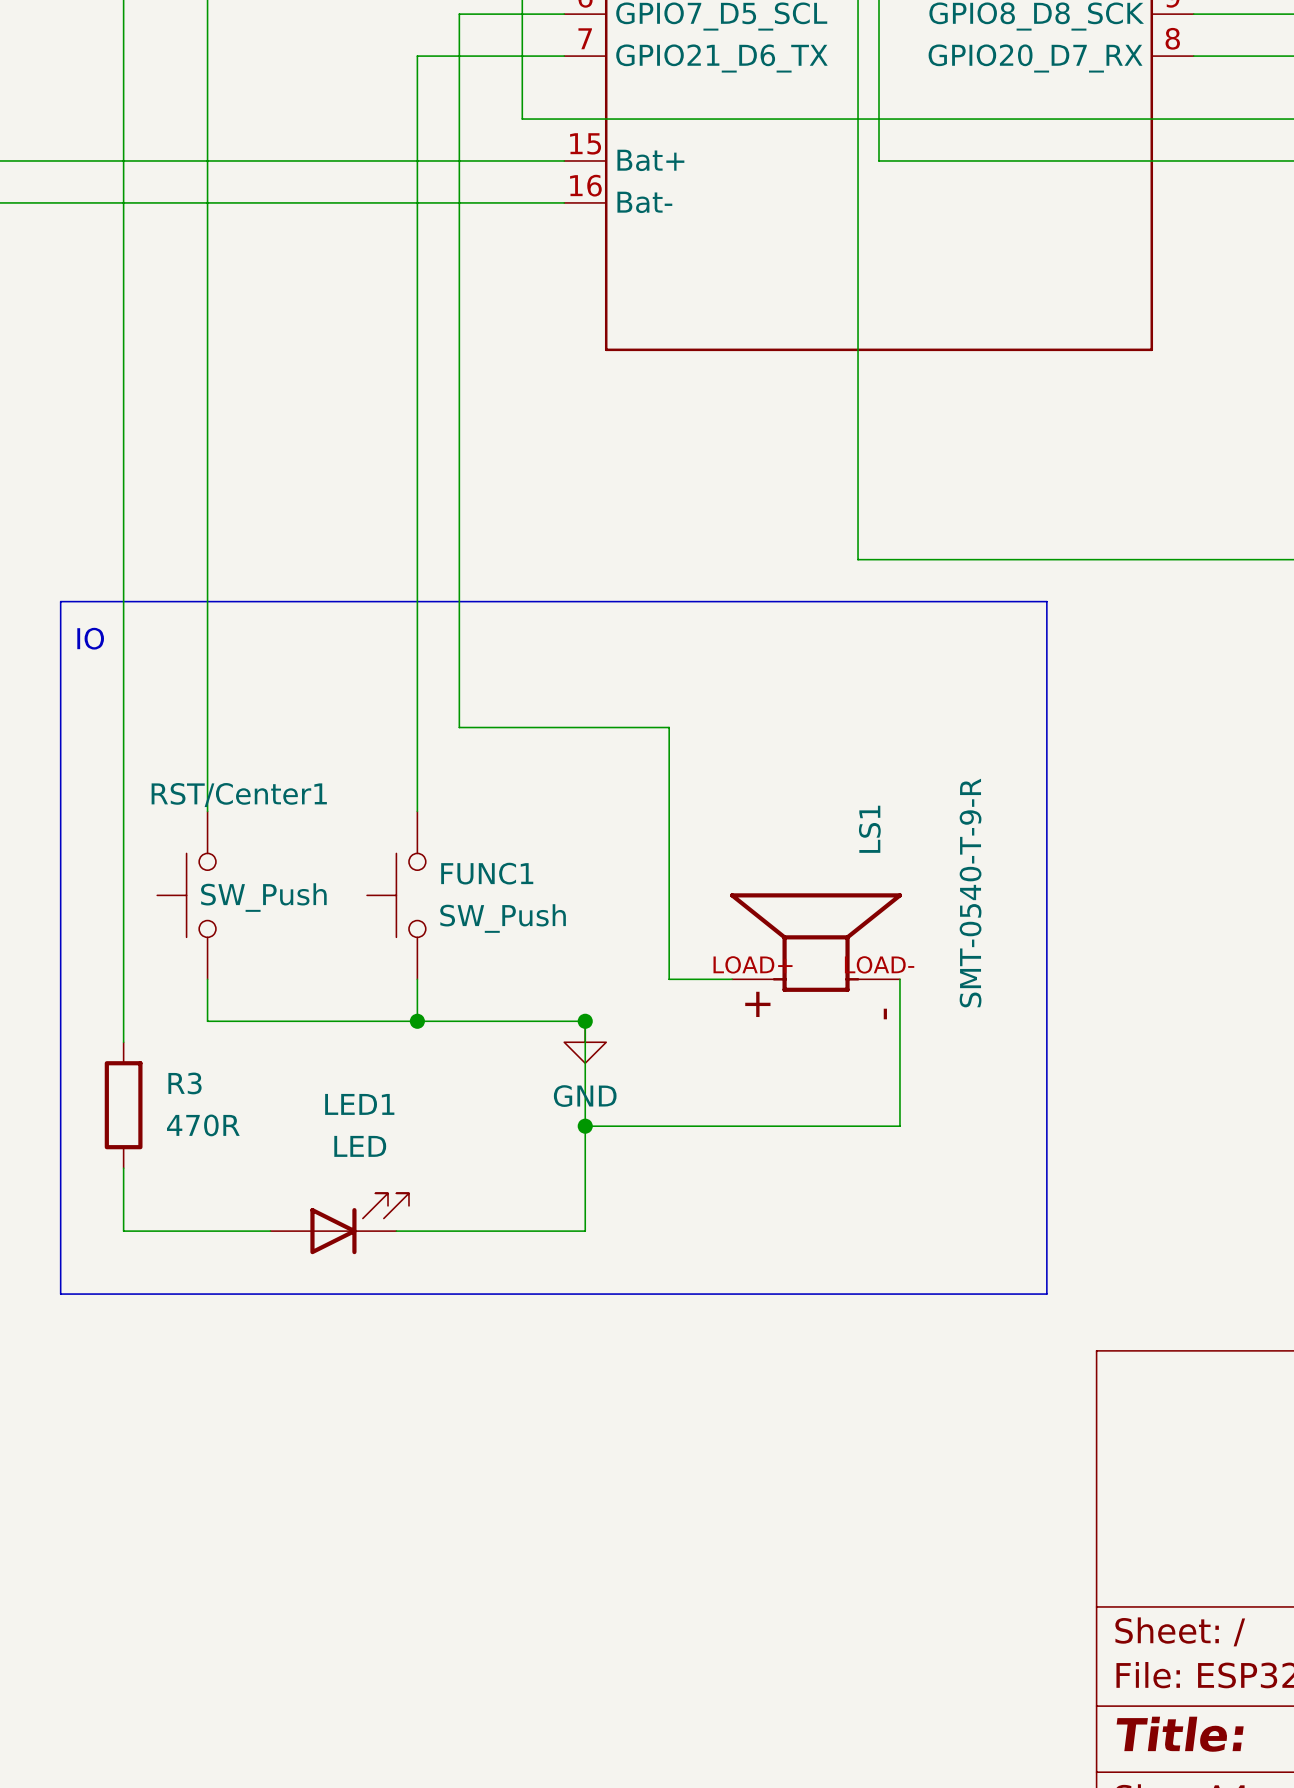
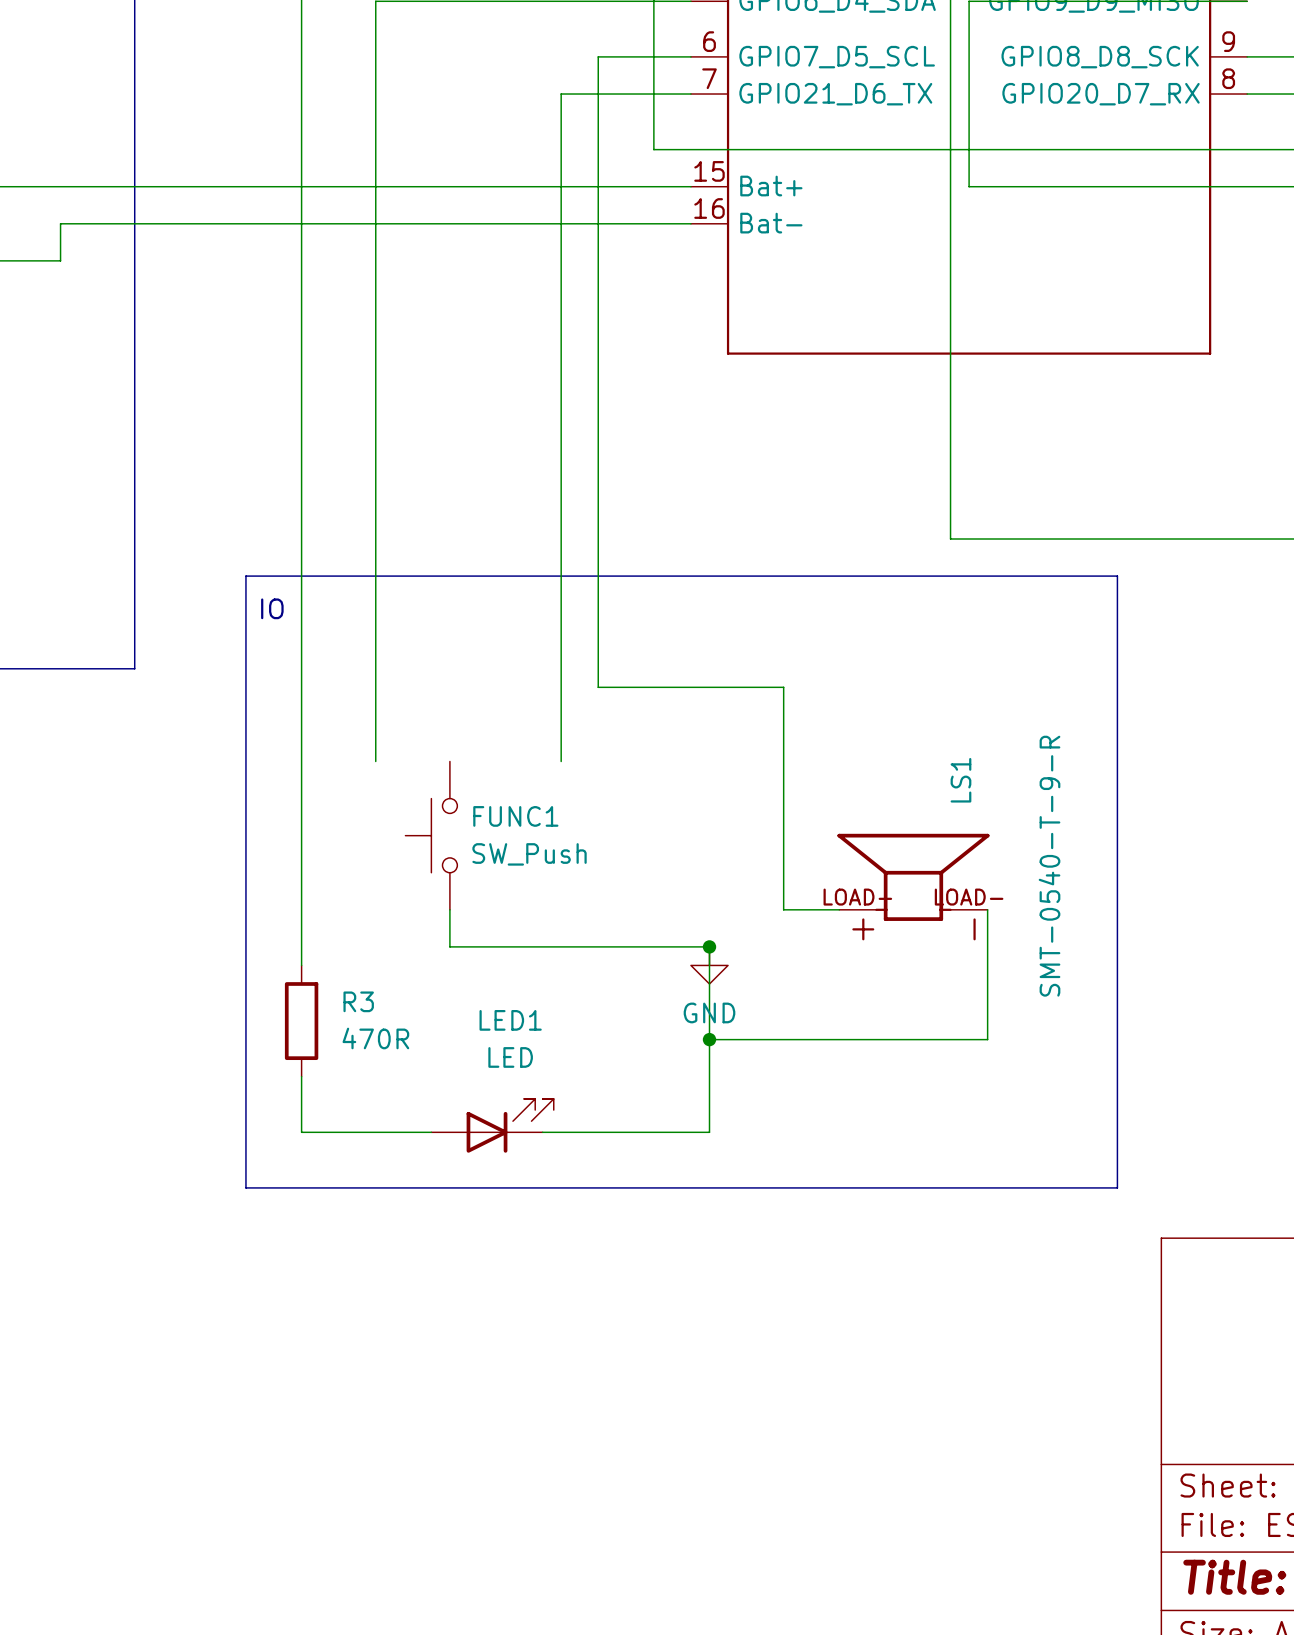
RST/Center1: SW_Push (186, 895) -> none
FUNC1 position: (396, 895) -> (431, 835)
wire: (207, 979) (207, 1021) (291, 1021) -> (449, 909) (449, 946)
wire: (417, 979) (417, 1021) -> none
junction: (417, 1021) -> none

